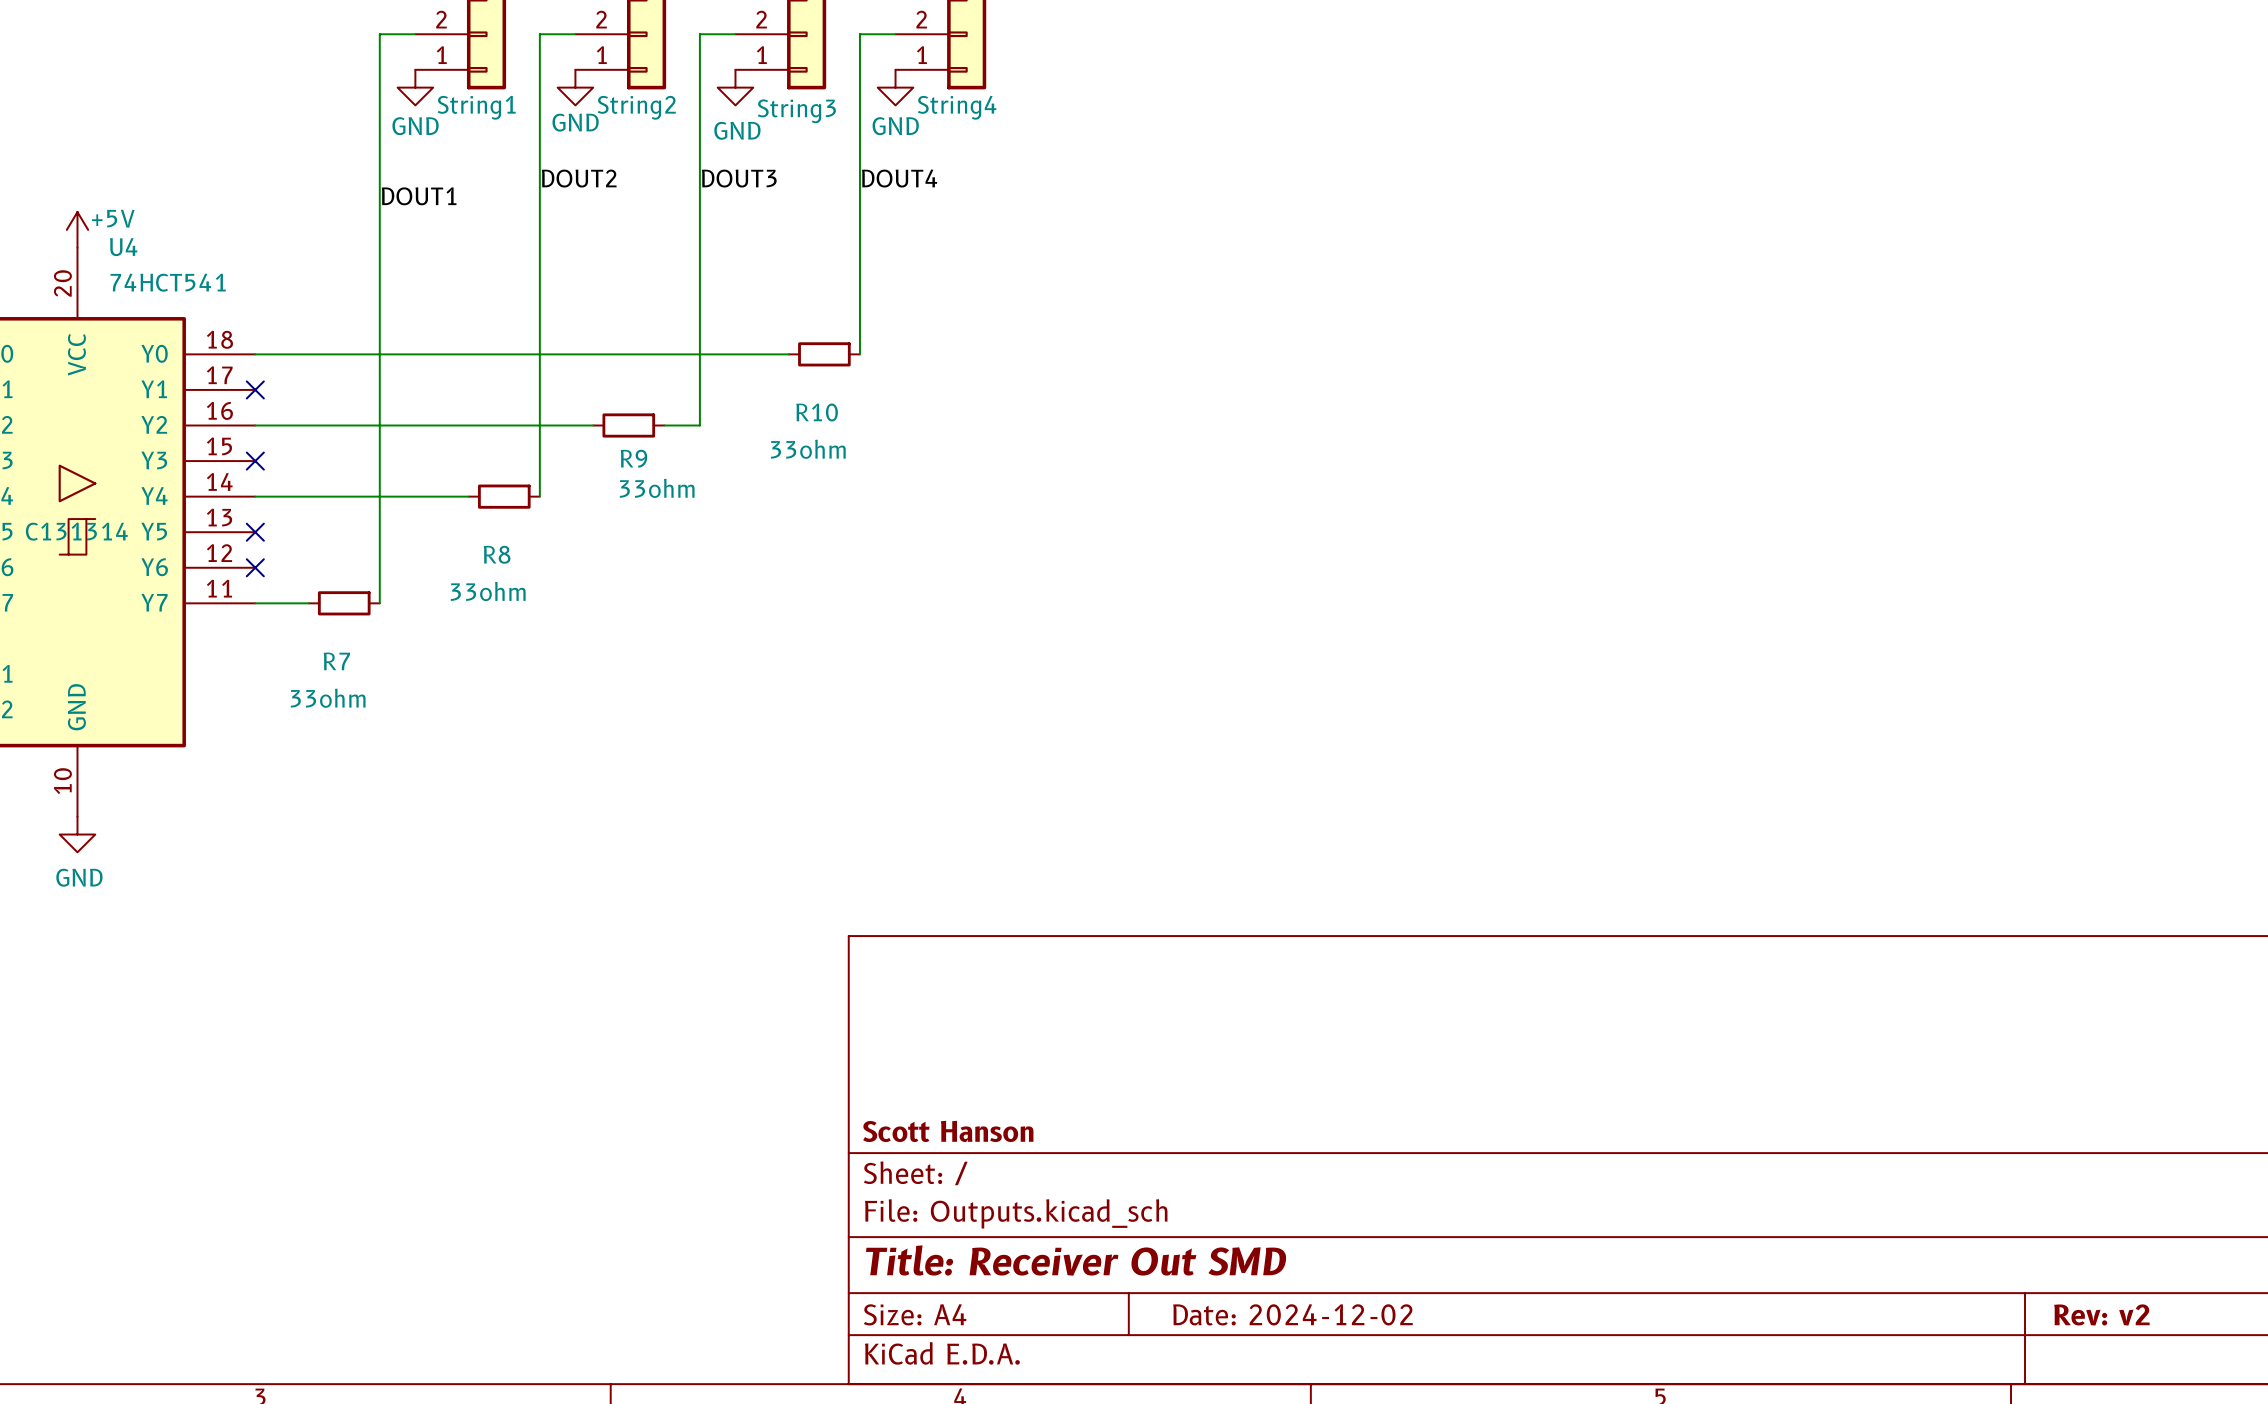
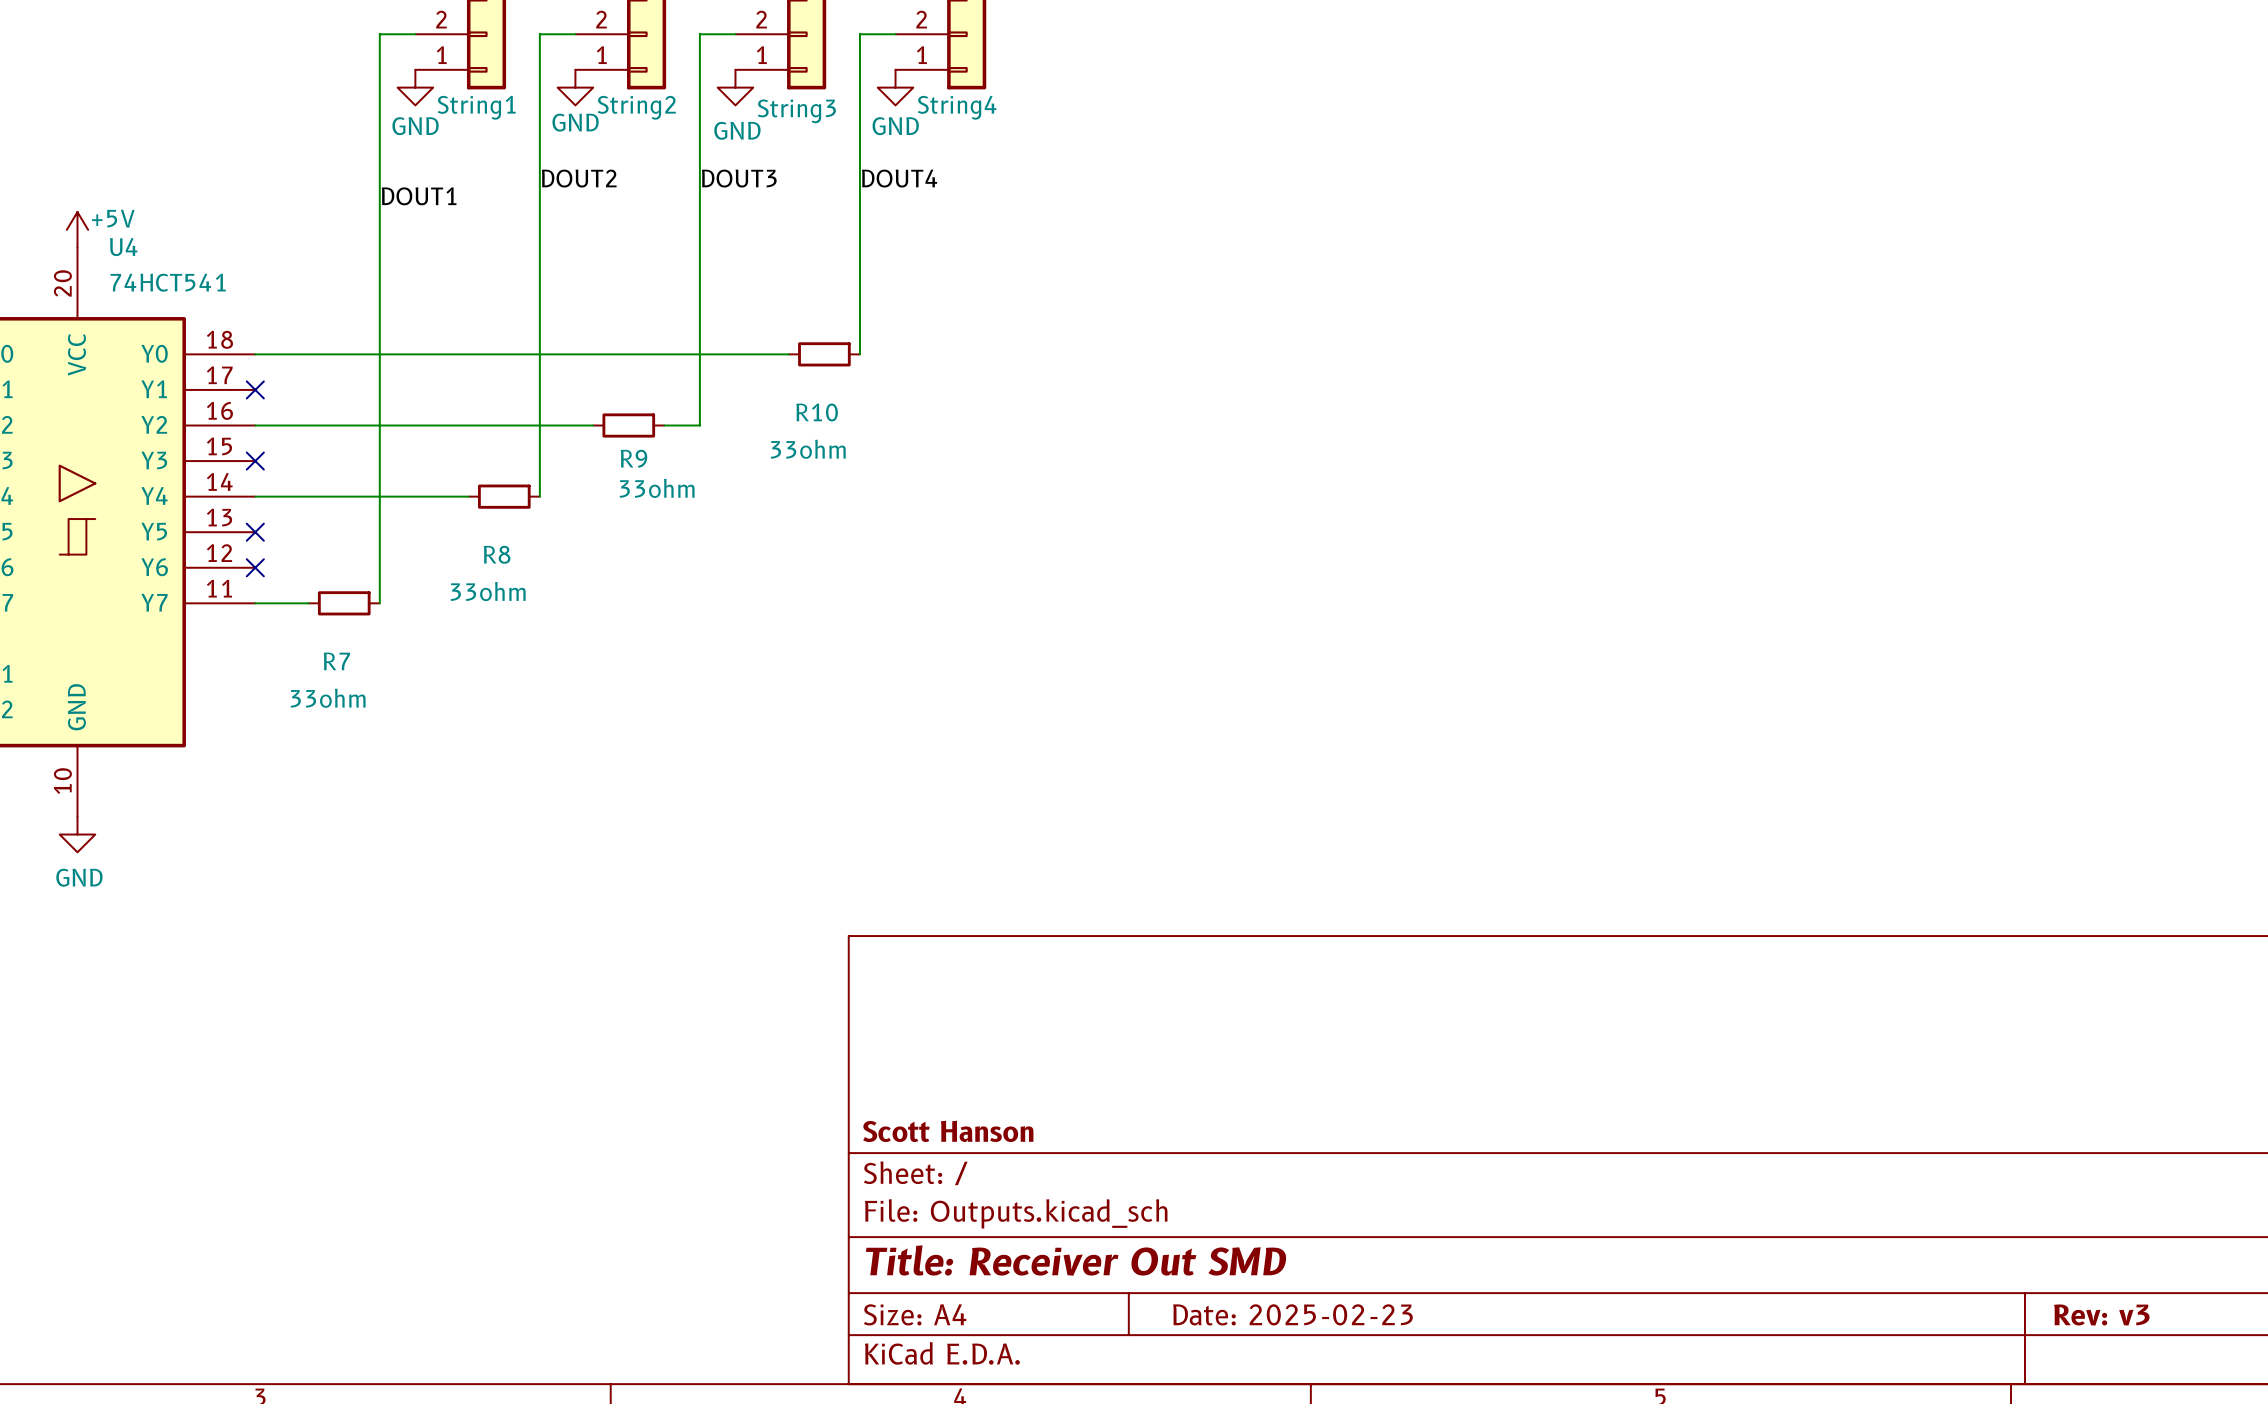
U4 text: C131314 (76, 531) -> none
title block: Date: 2024-12-02 (1292, 1314) -> Date: 2025-02-23 (1292, 1314)
title block: Rev: v2 (2101, 1314) -> Rev: v3 (2101, 1315)

